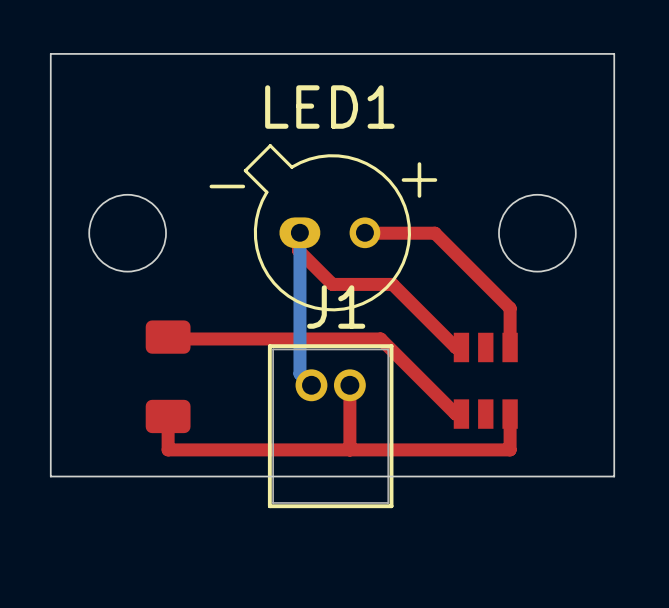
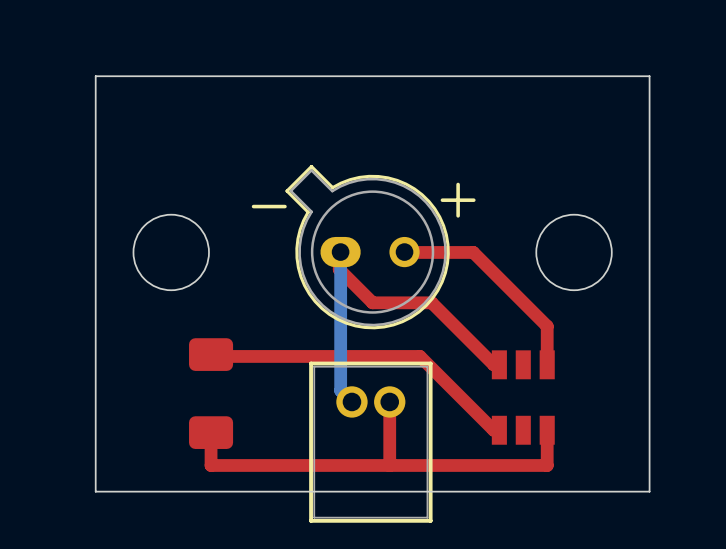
LED1: (327, 227) -> none
part: none -> (367, 247)
J1 name: J1 (336, 307) -> none

